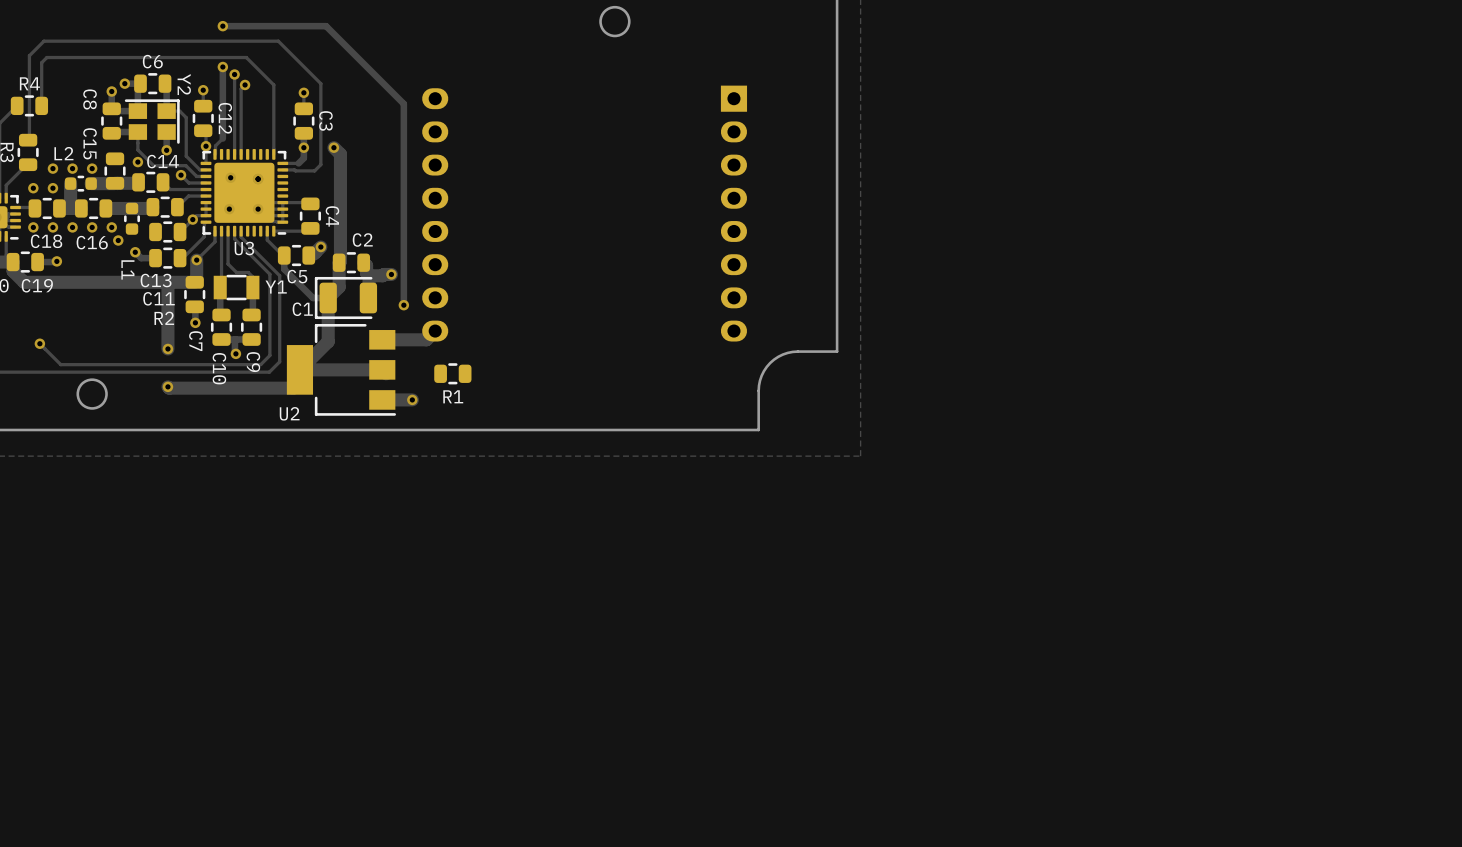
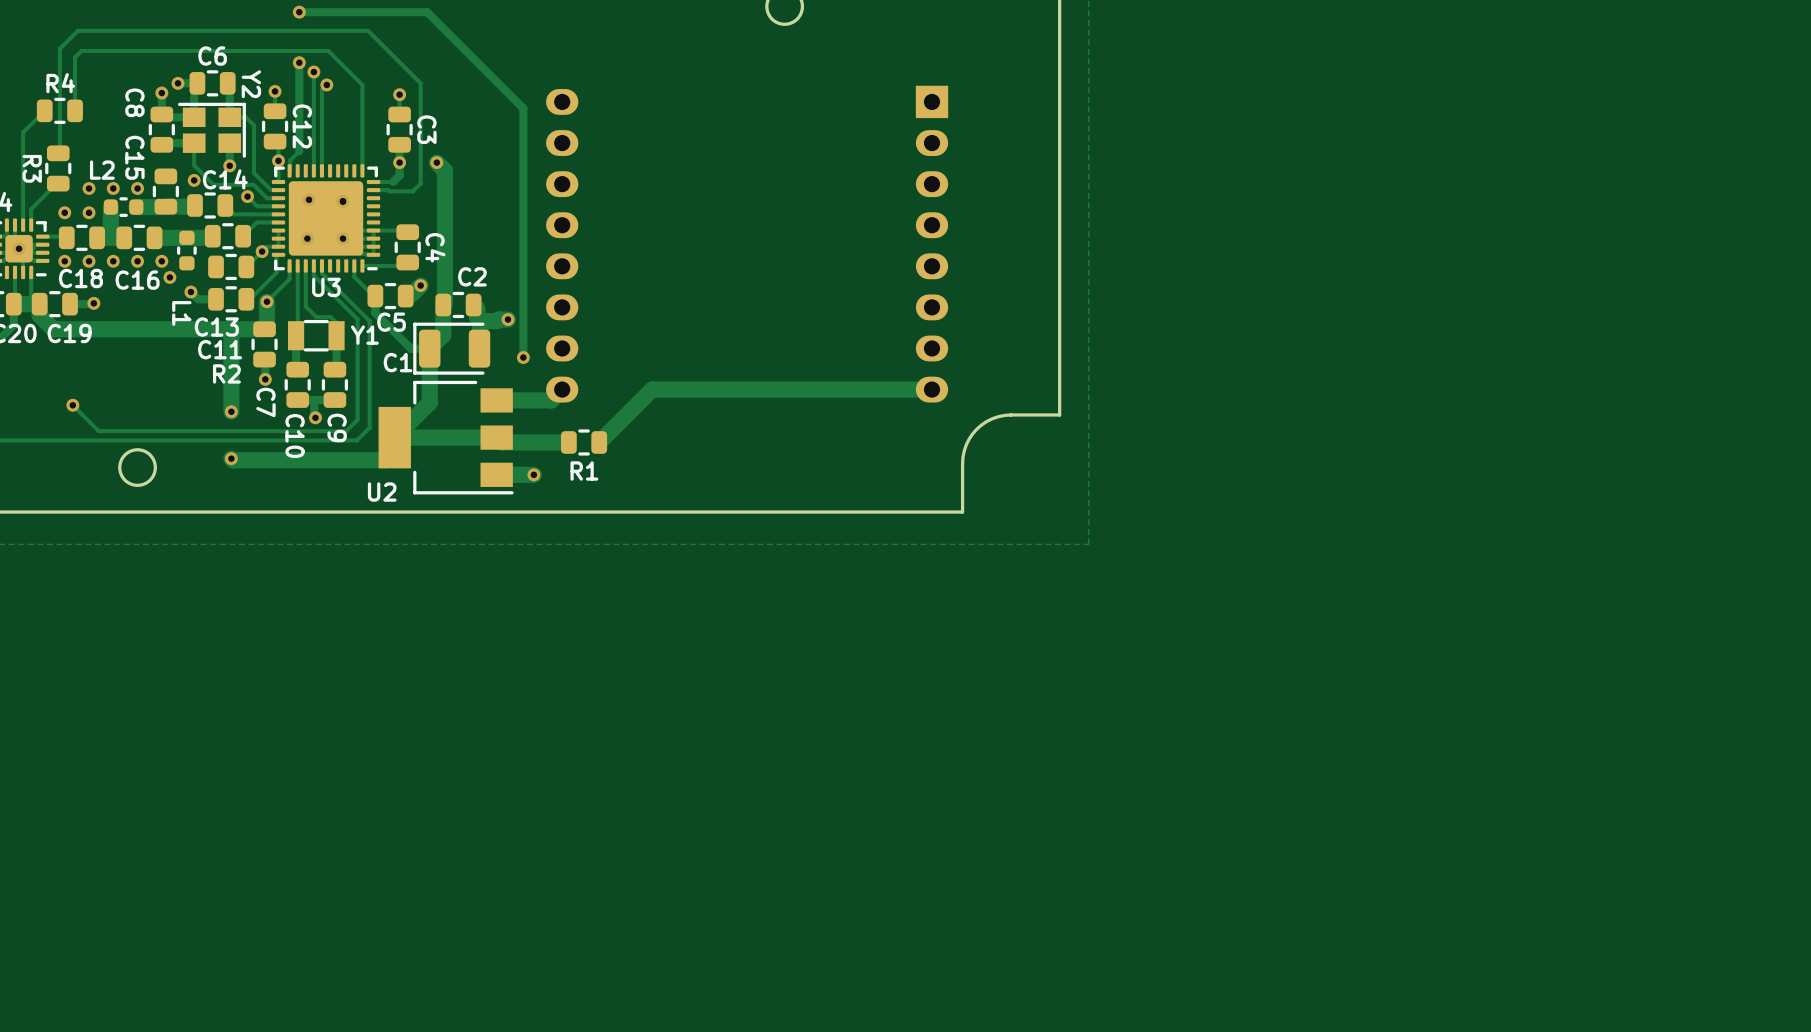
track: none -> (932, 389) (652, 389) (599, 442)
track: none -> (568, 442) (501, 442)

